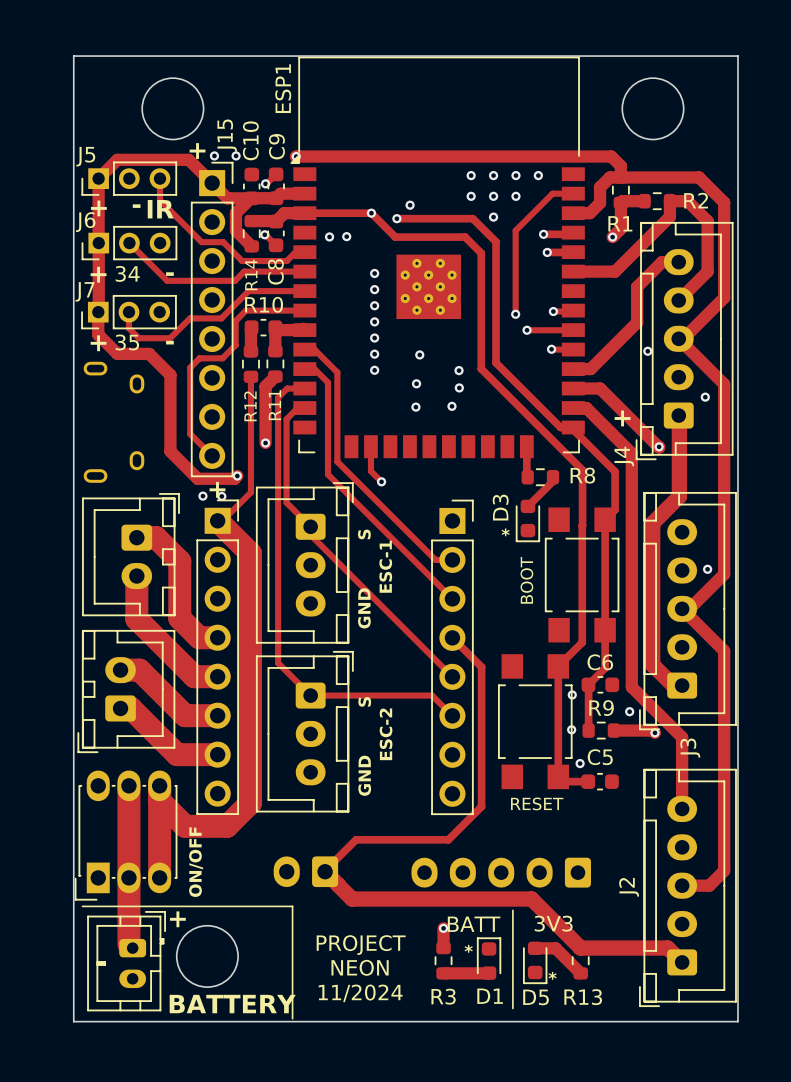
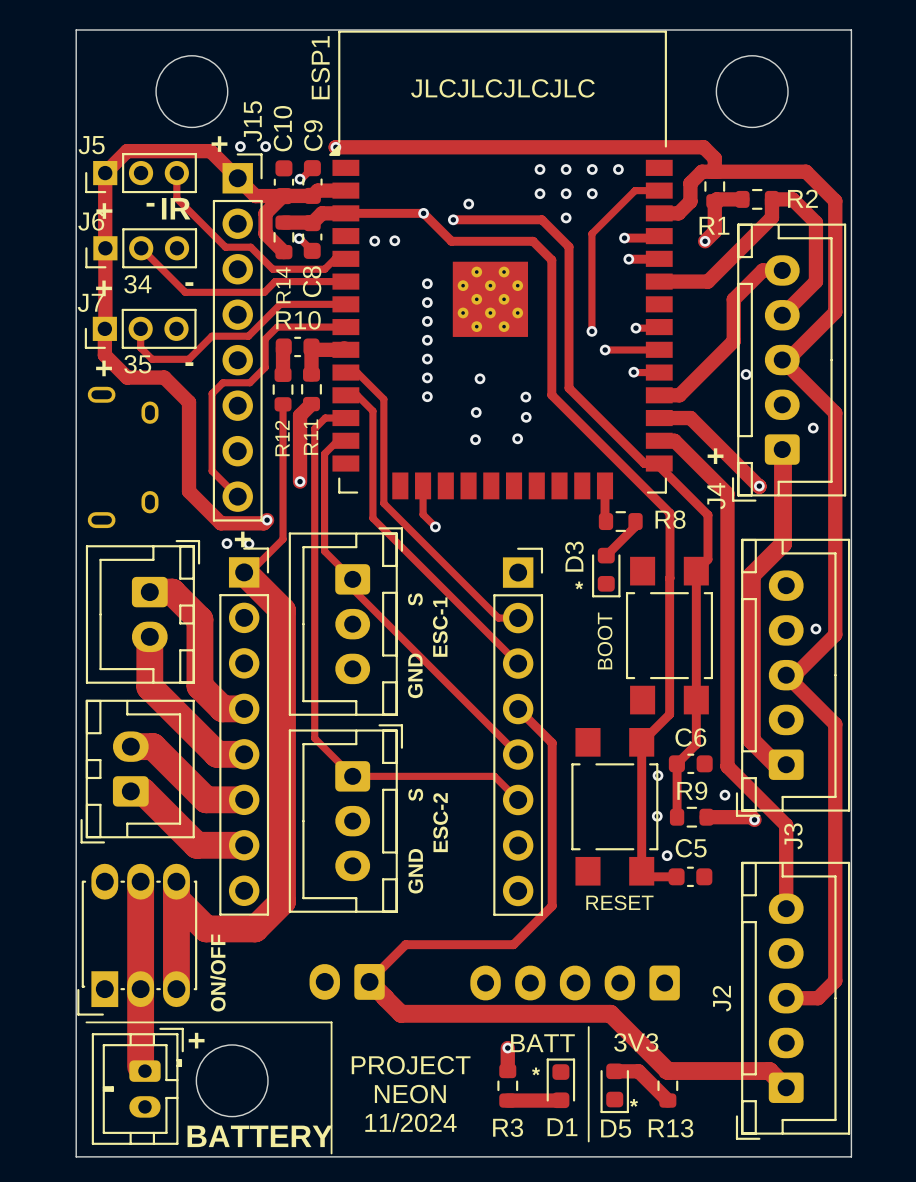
text: none -> JLCJLCJLCJLC (503, 88)

